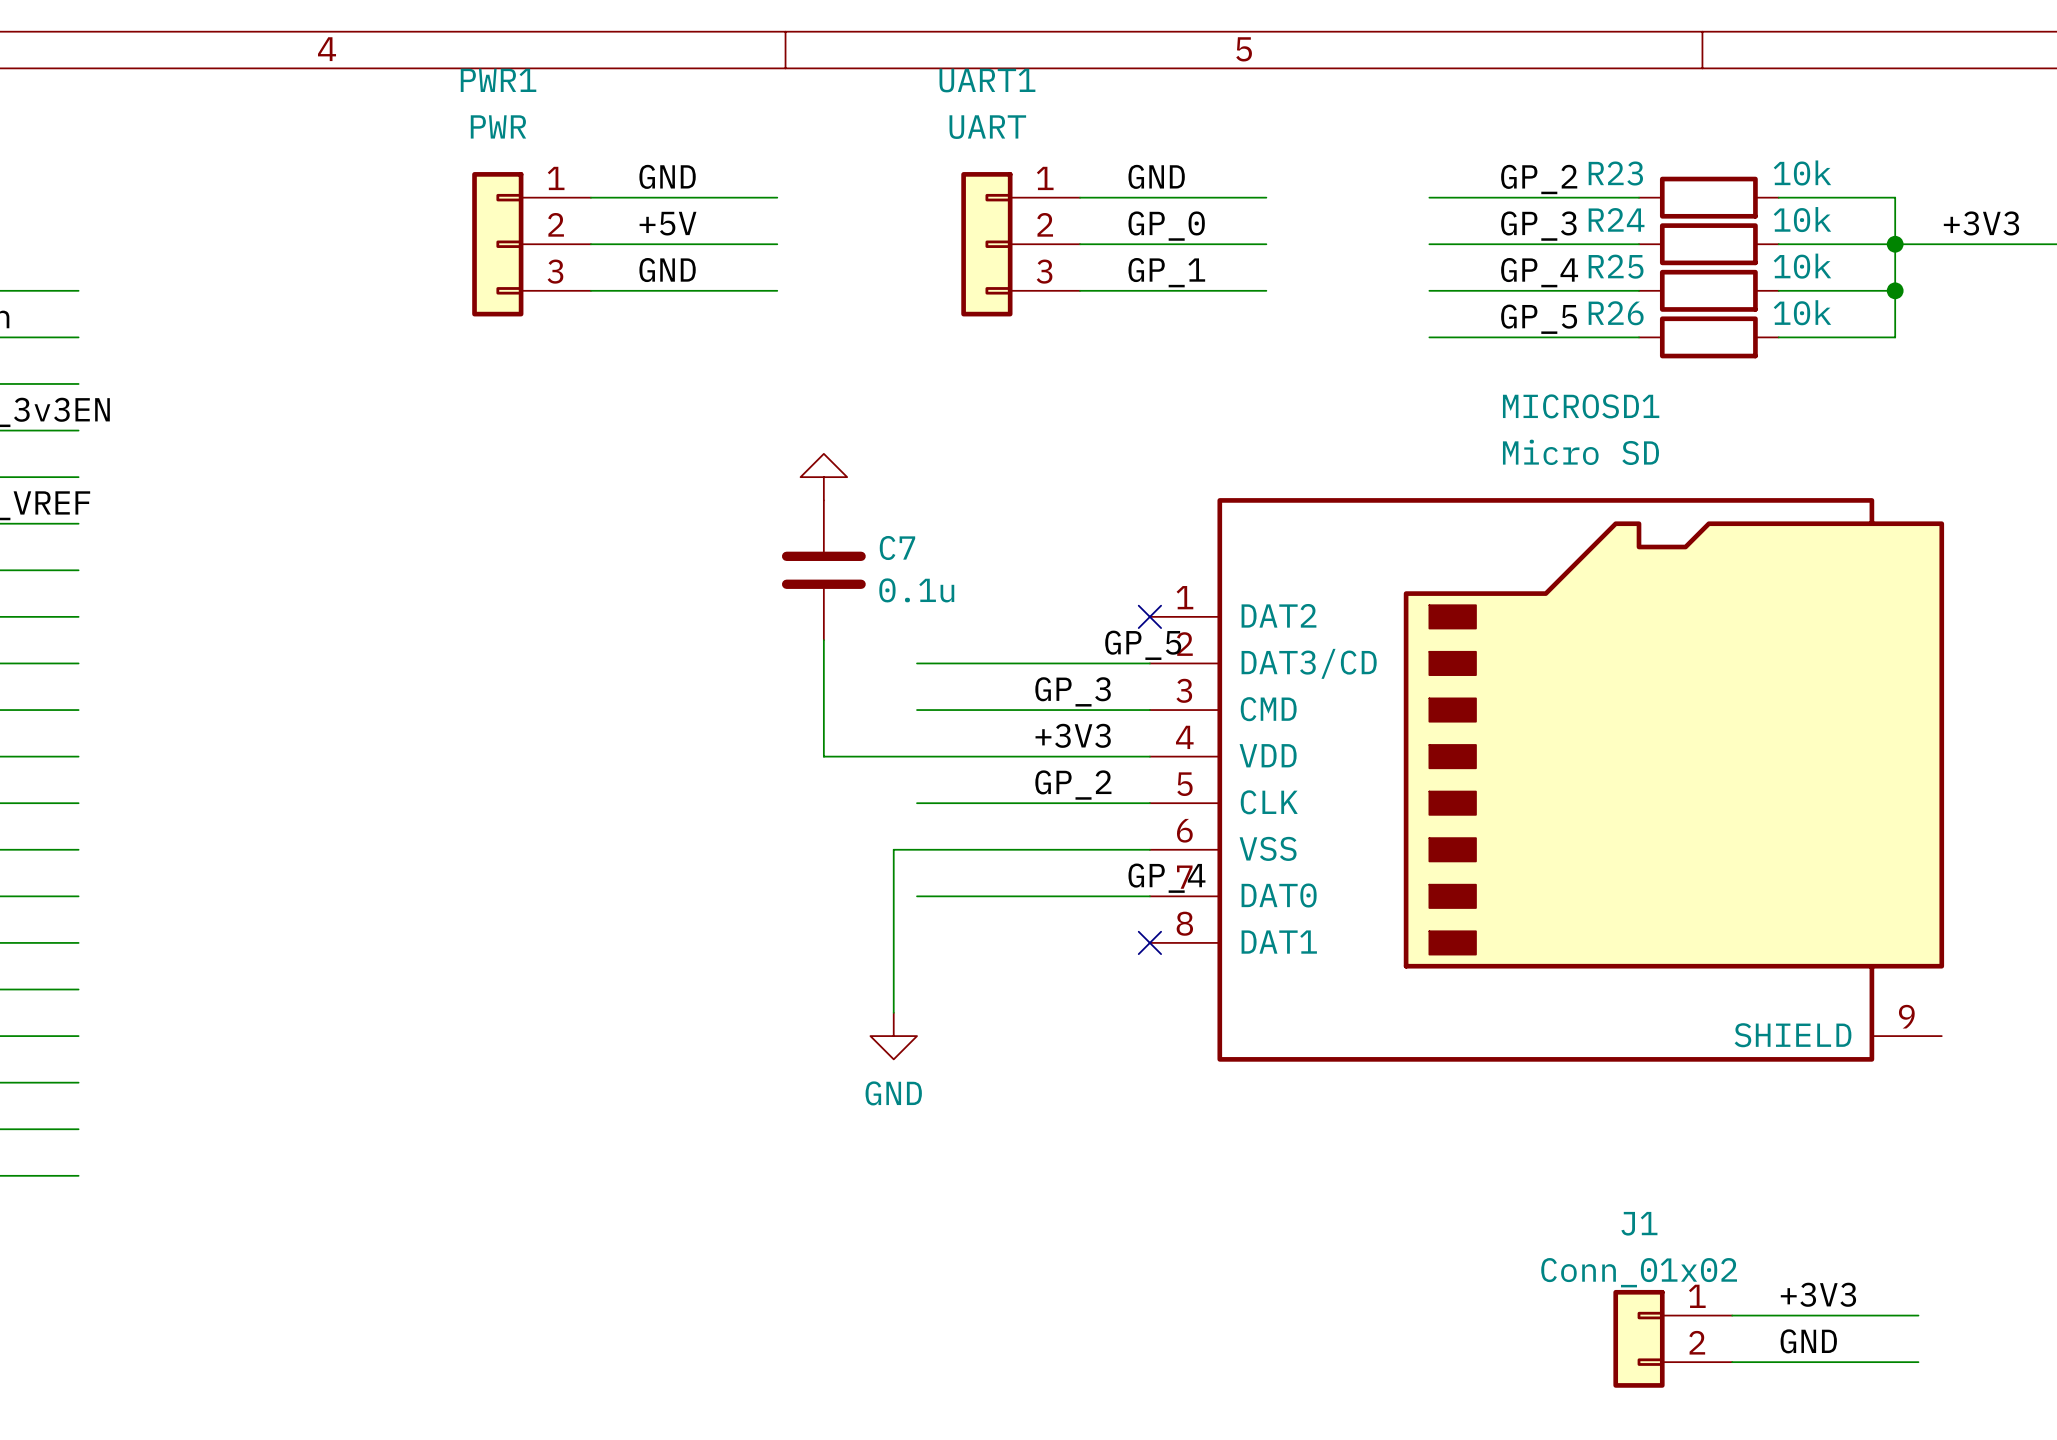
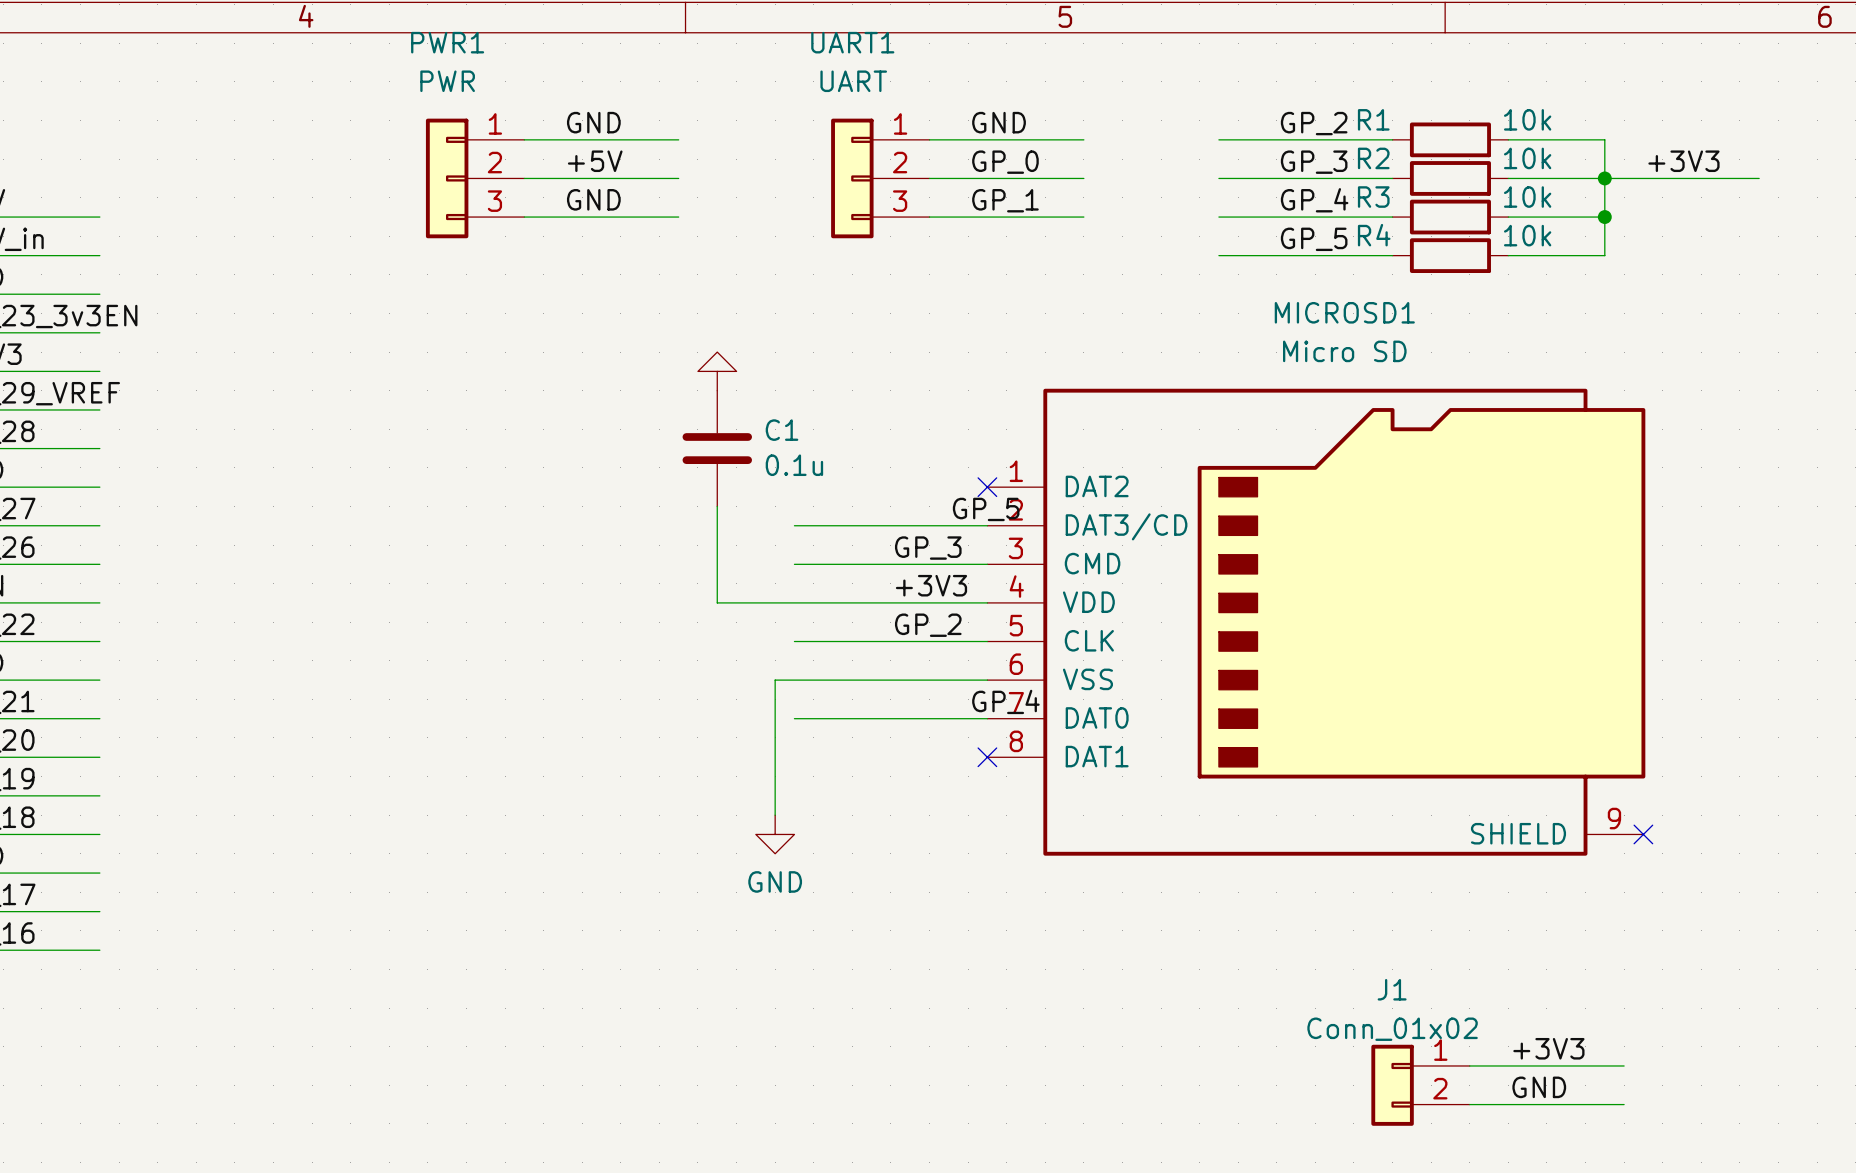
R23 name: R23 (1615, 173) -> R1 (1373, 119)
R24 name: R24 (1616, 219) -> R2 (1373, 158)
R25 name: R25 (1616, 266) -> R3 (1373, 197)
R26 name: R26 (1616, 313) -> R4 (1374, 235)
C7 name: C7 (897, 548) -> C1 (782, 430)
no-connect mark: none -> (1643, 834)

